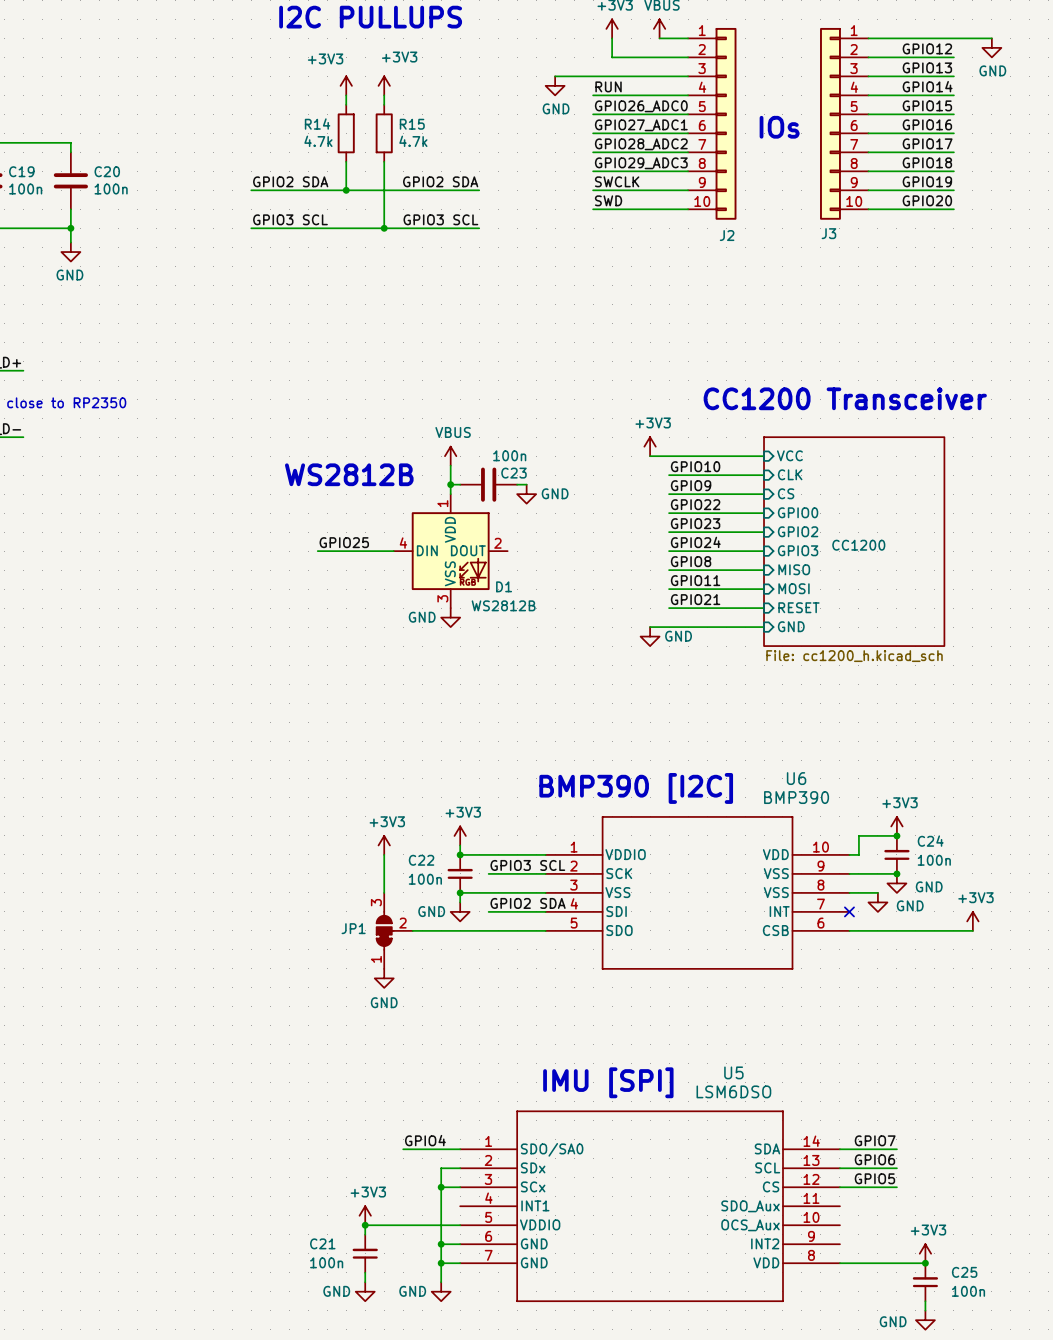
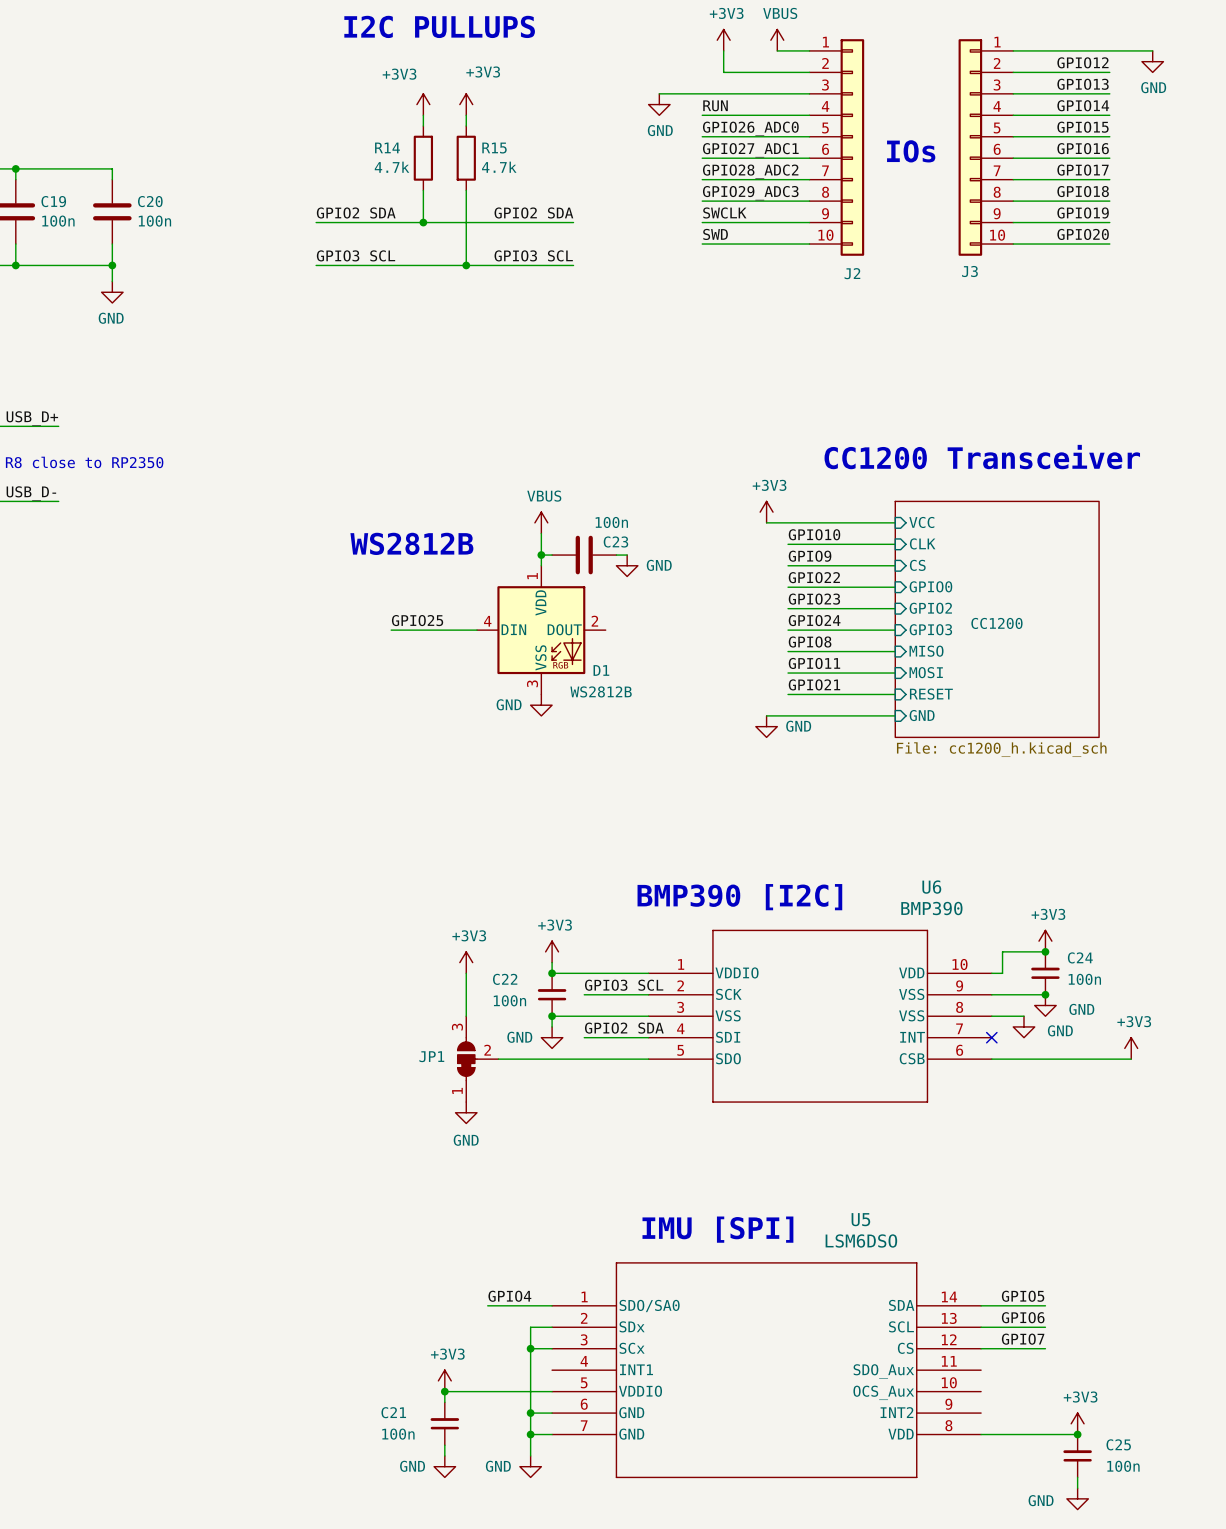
label: GPIO7 (875, 1140) -> GPIO5 (1023, 1296)
label: GPIO5 (874, 1178) -> GPIO7 (1023, 1339)

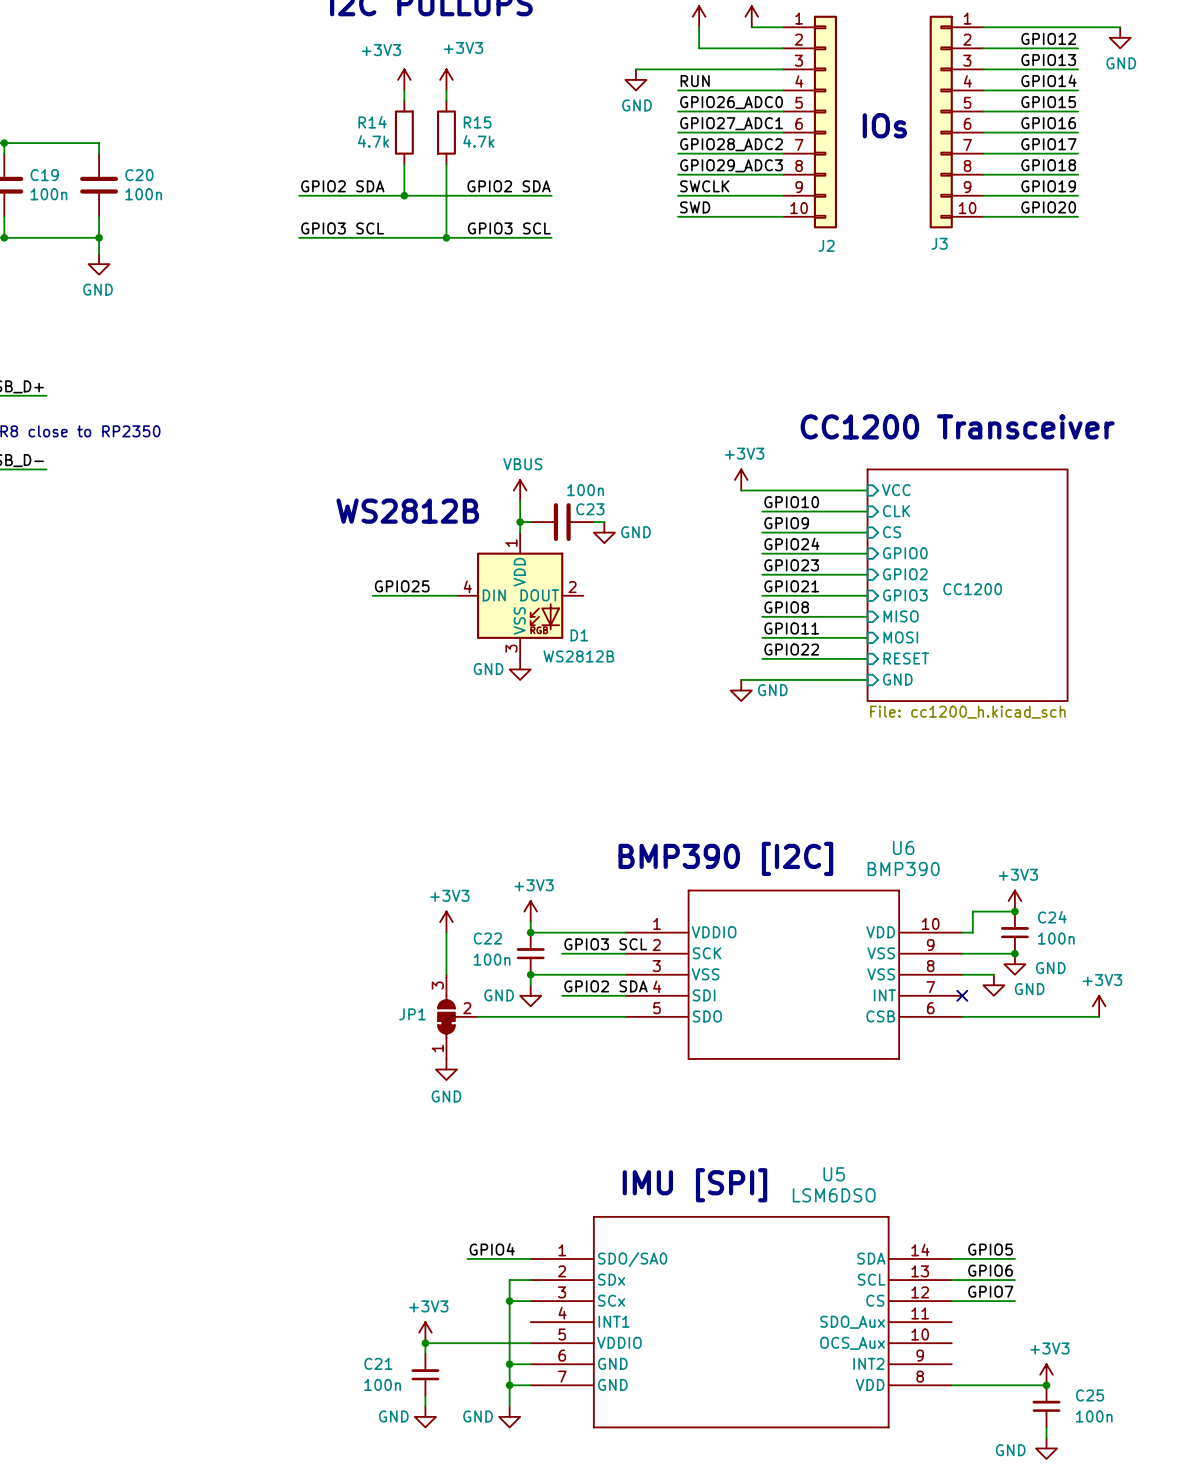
label: GPIO22 (814, 577) -> GPIO24 (791, 544)
label: GPIO24 (814, 620) -> GPIO21 (791, 586)
label: GPIO21 (814, 684) -> GPIO22 (791, 649)

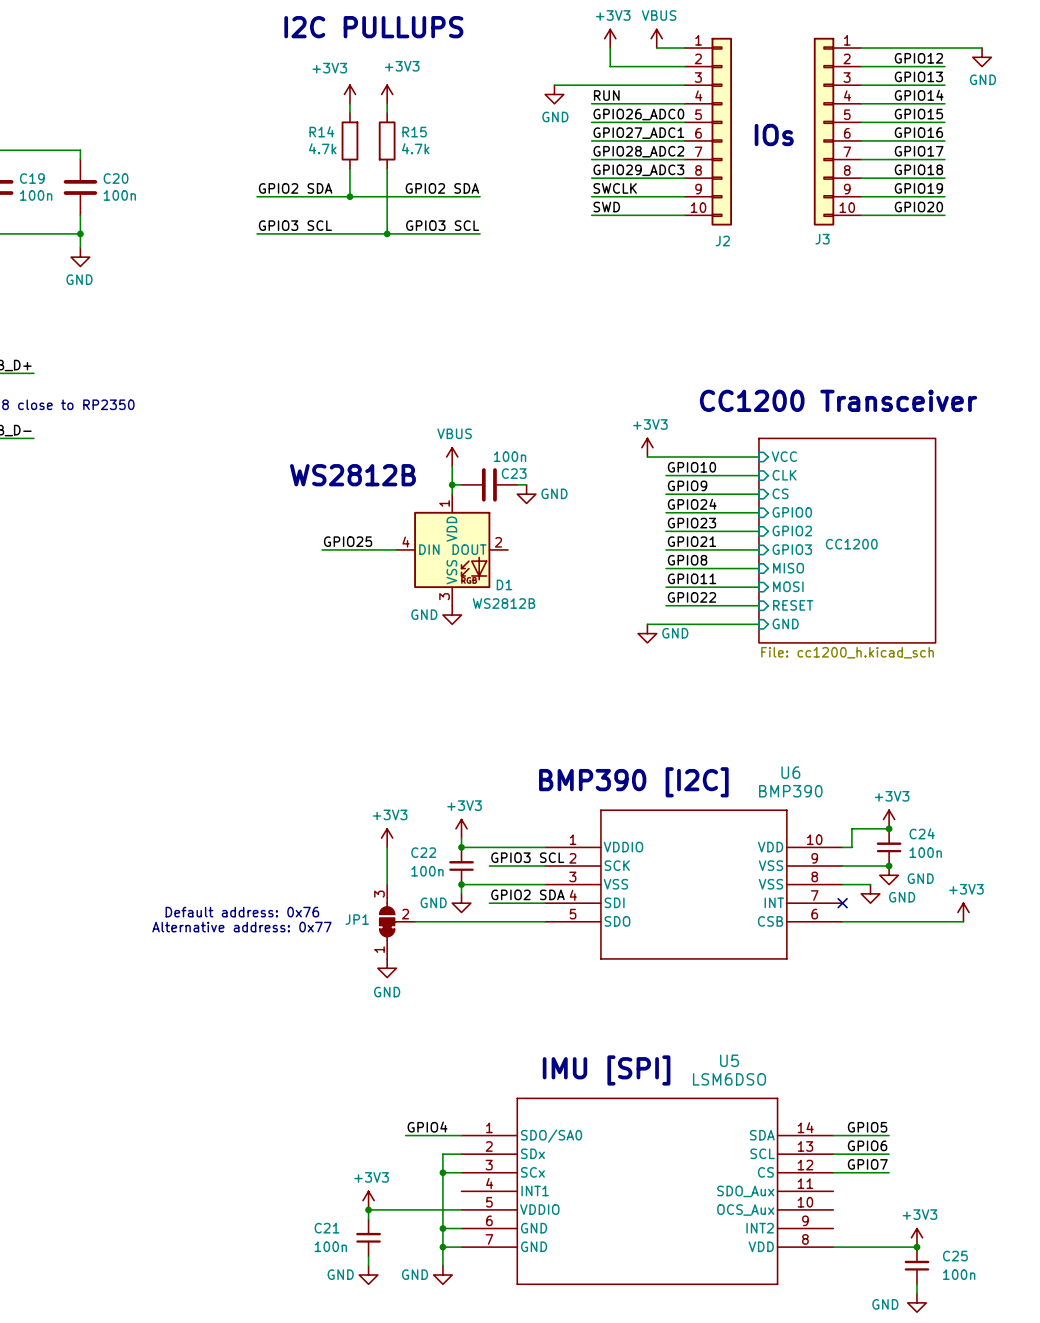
text: none -> Default address: 0x76 (242, 912)
text: none -> Alternative address: 0x77 (241, 927)

